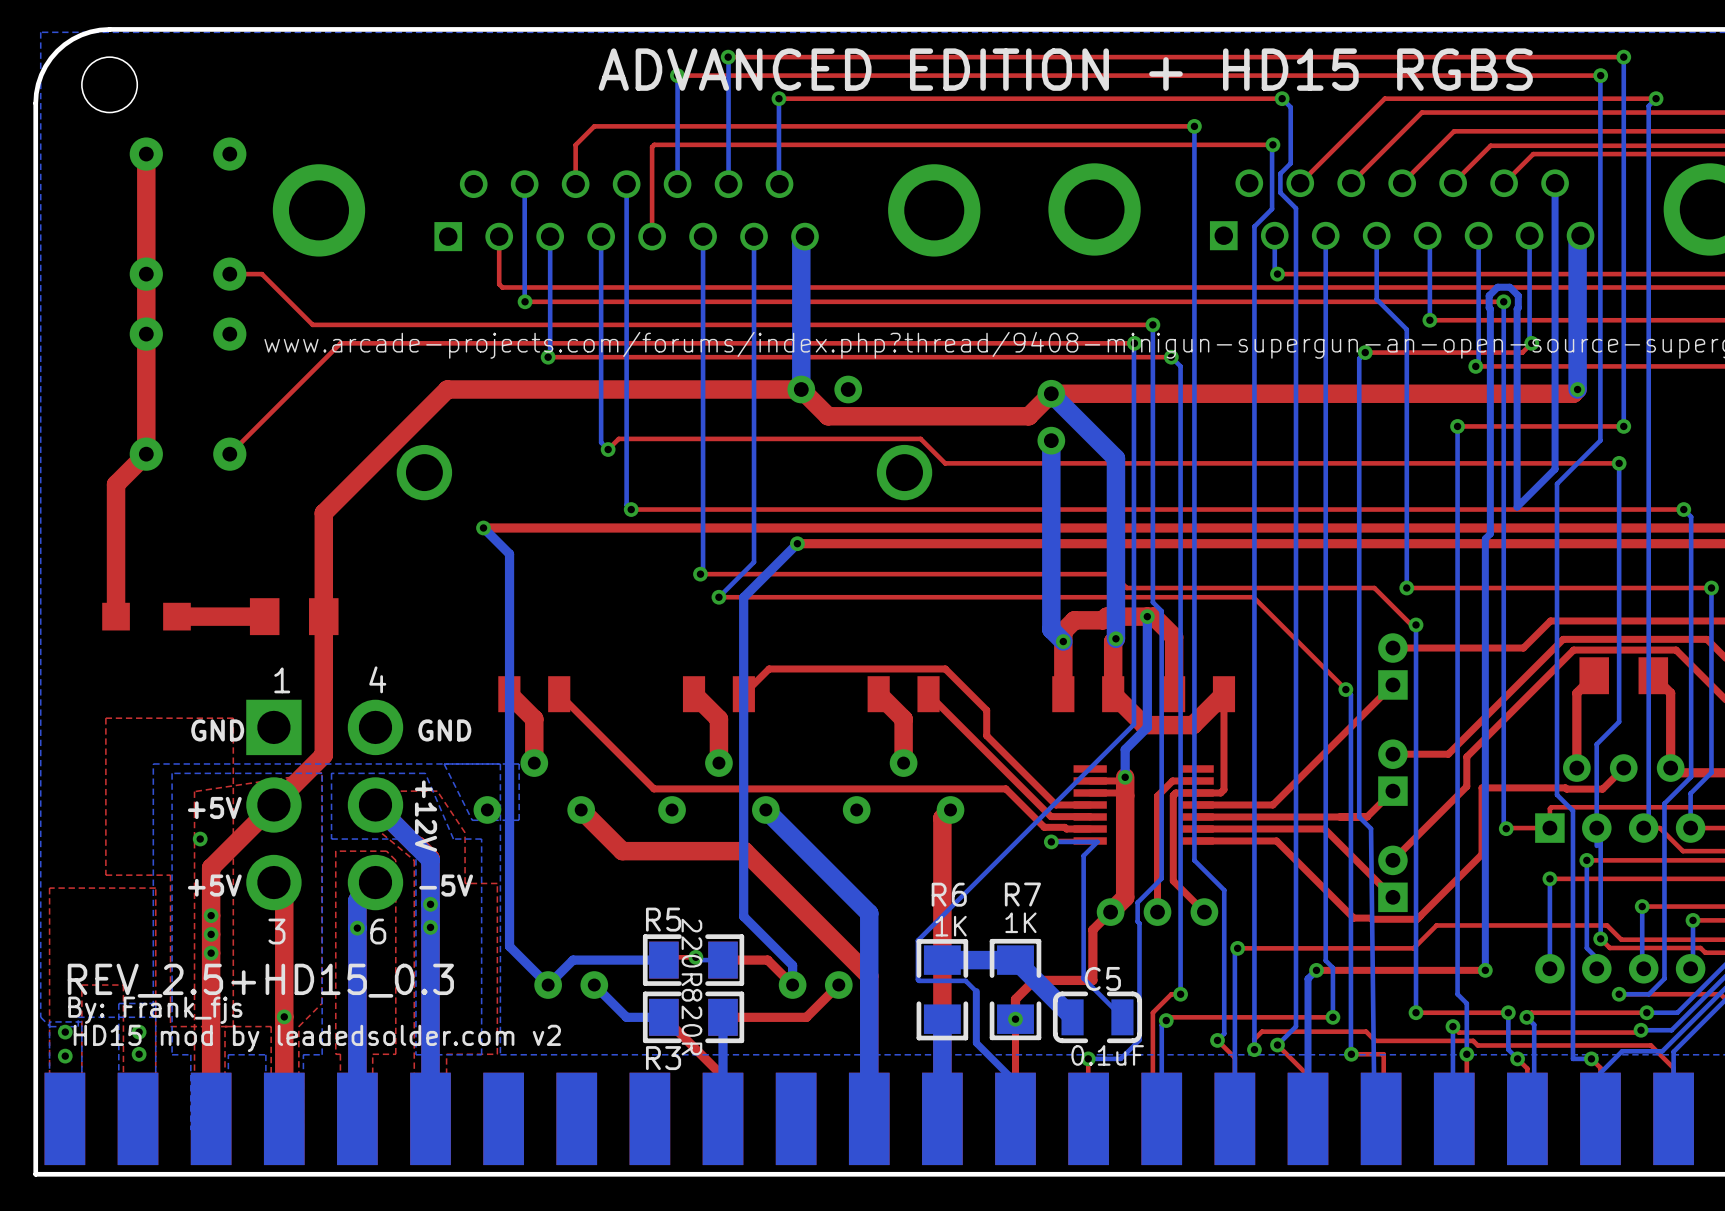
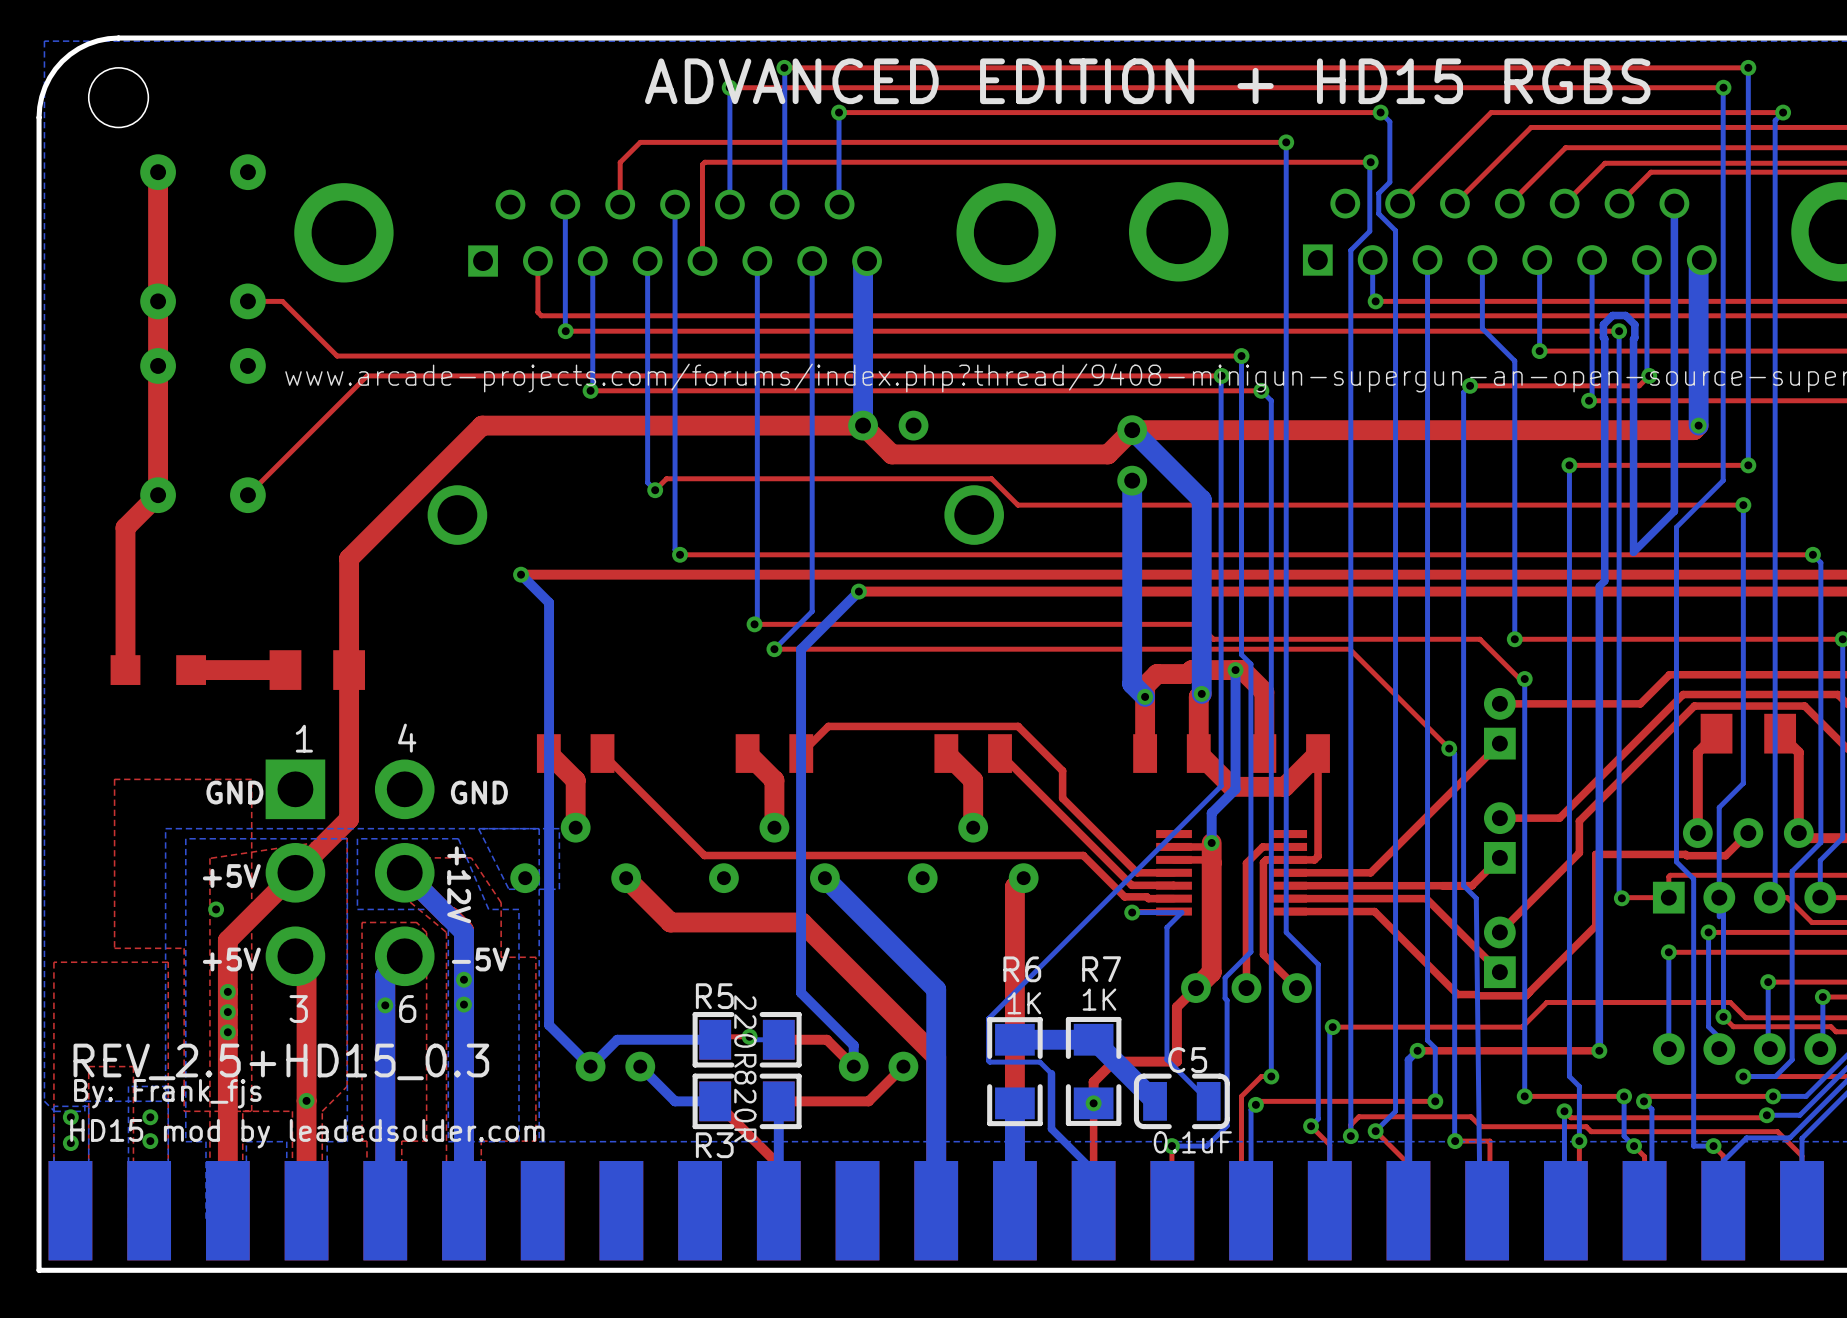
text: HD15 mod by leadedsolder.com v2 (317, 1038) -> HD15 mod by leadedsolder.com (307, 1133)

